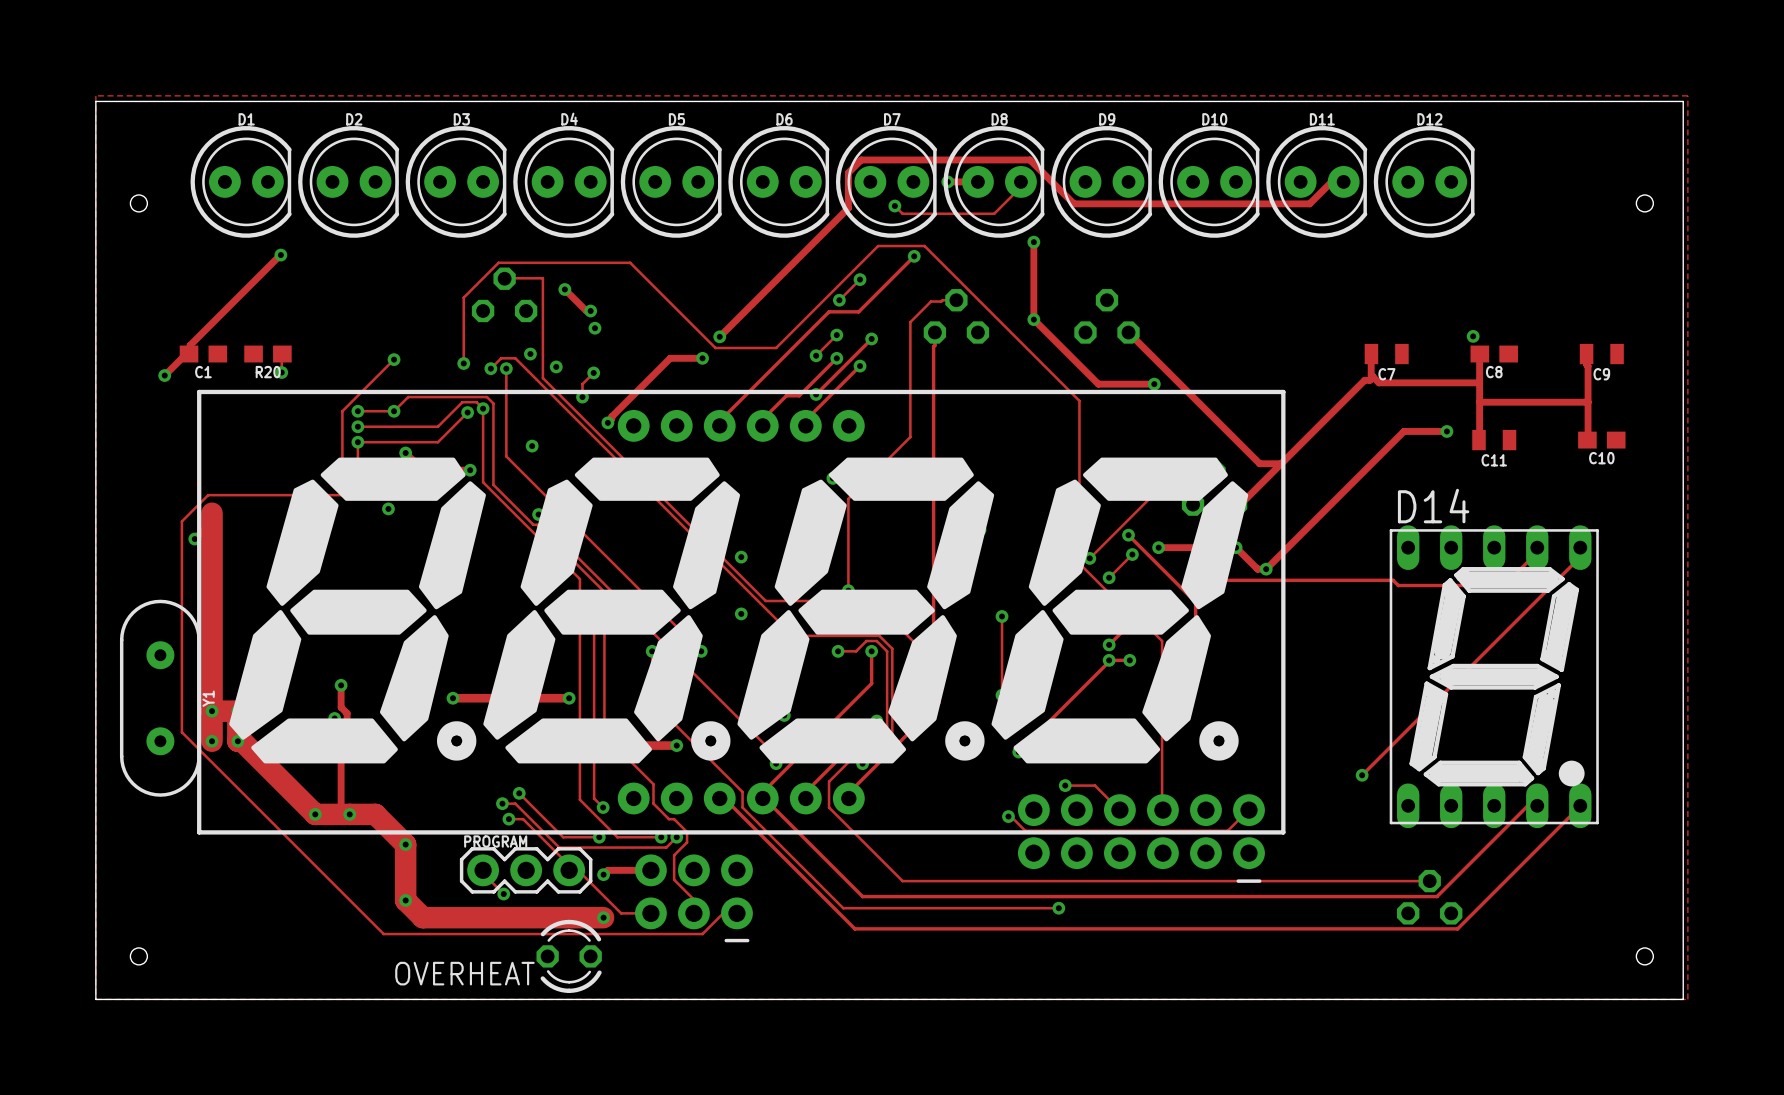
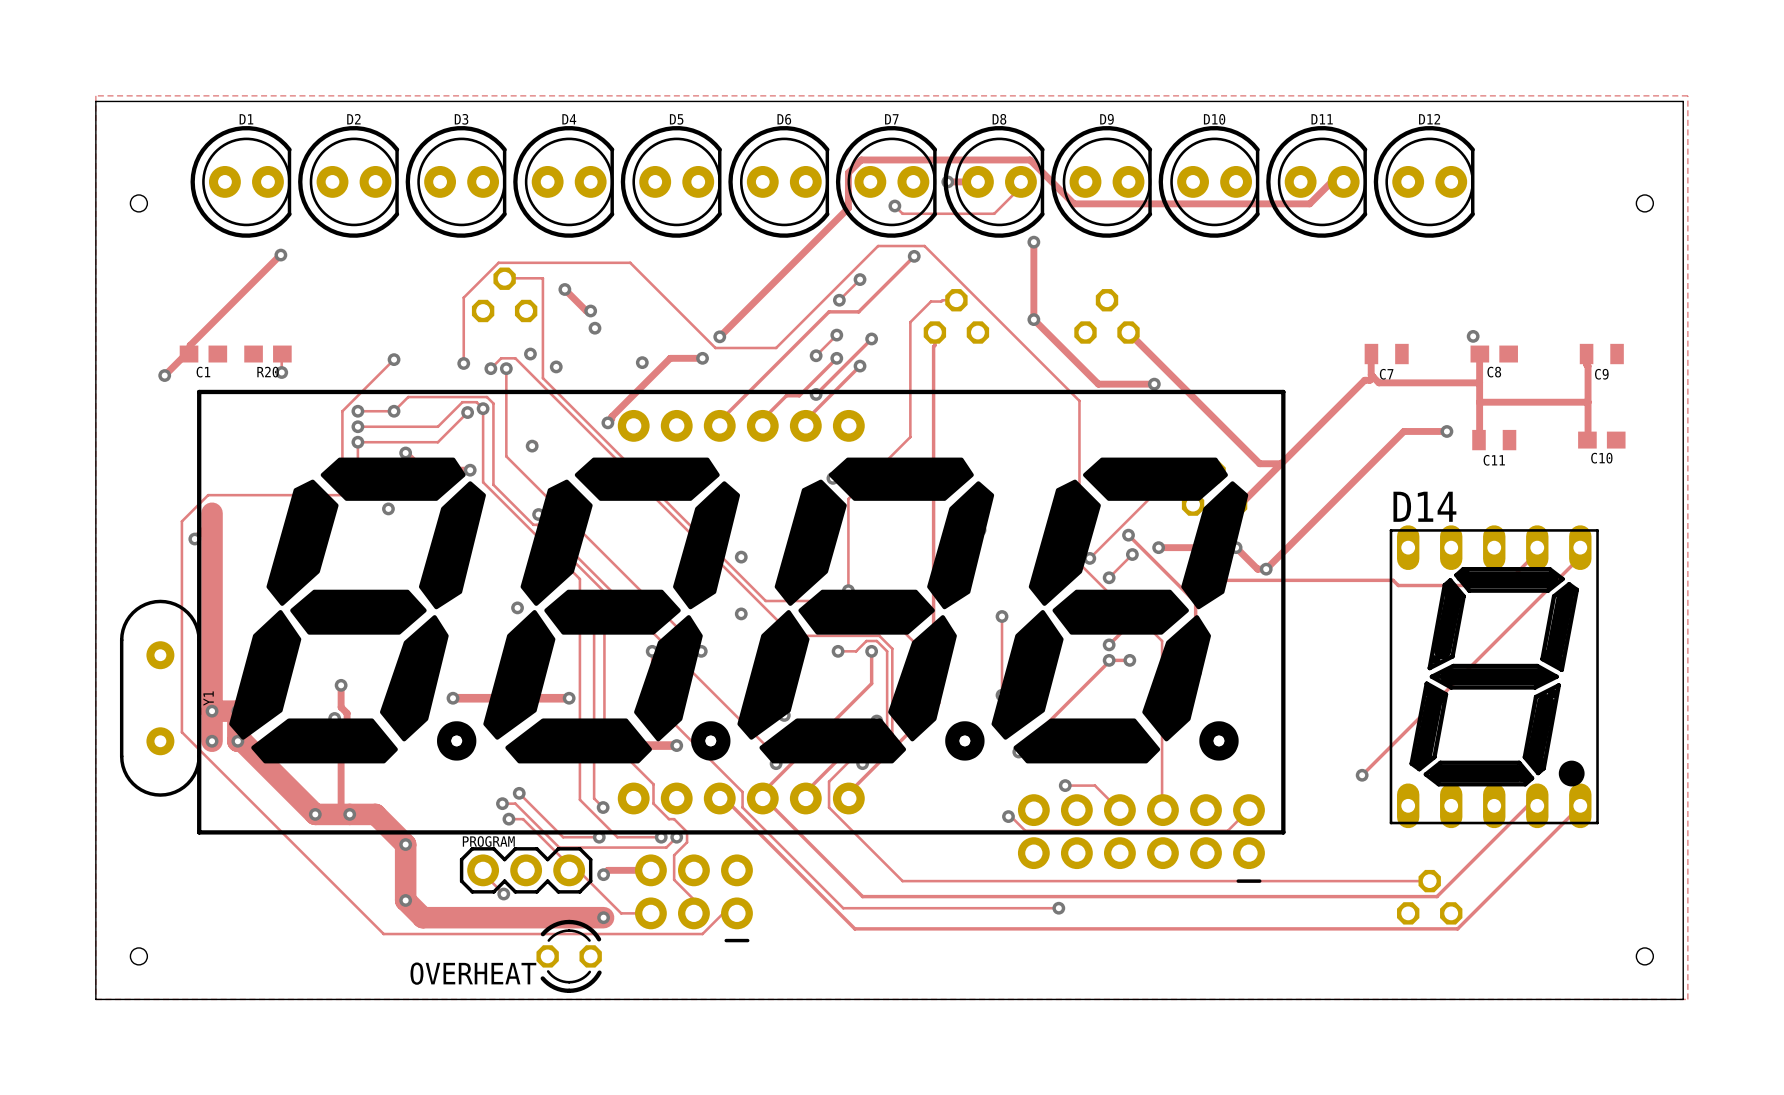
via: none -> (642, 362)
track: (593, 372) (582, 384) (582, 397) -> none
via: (593, 372) -> none
via: (582, 397) -> none
via: none -> (517, 607)

